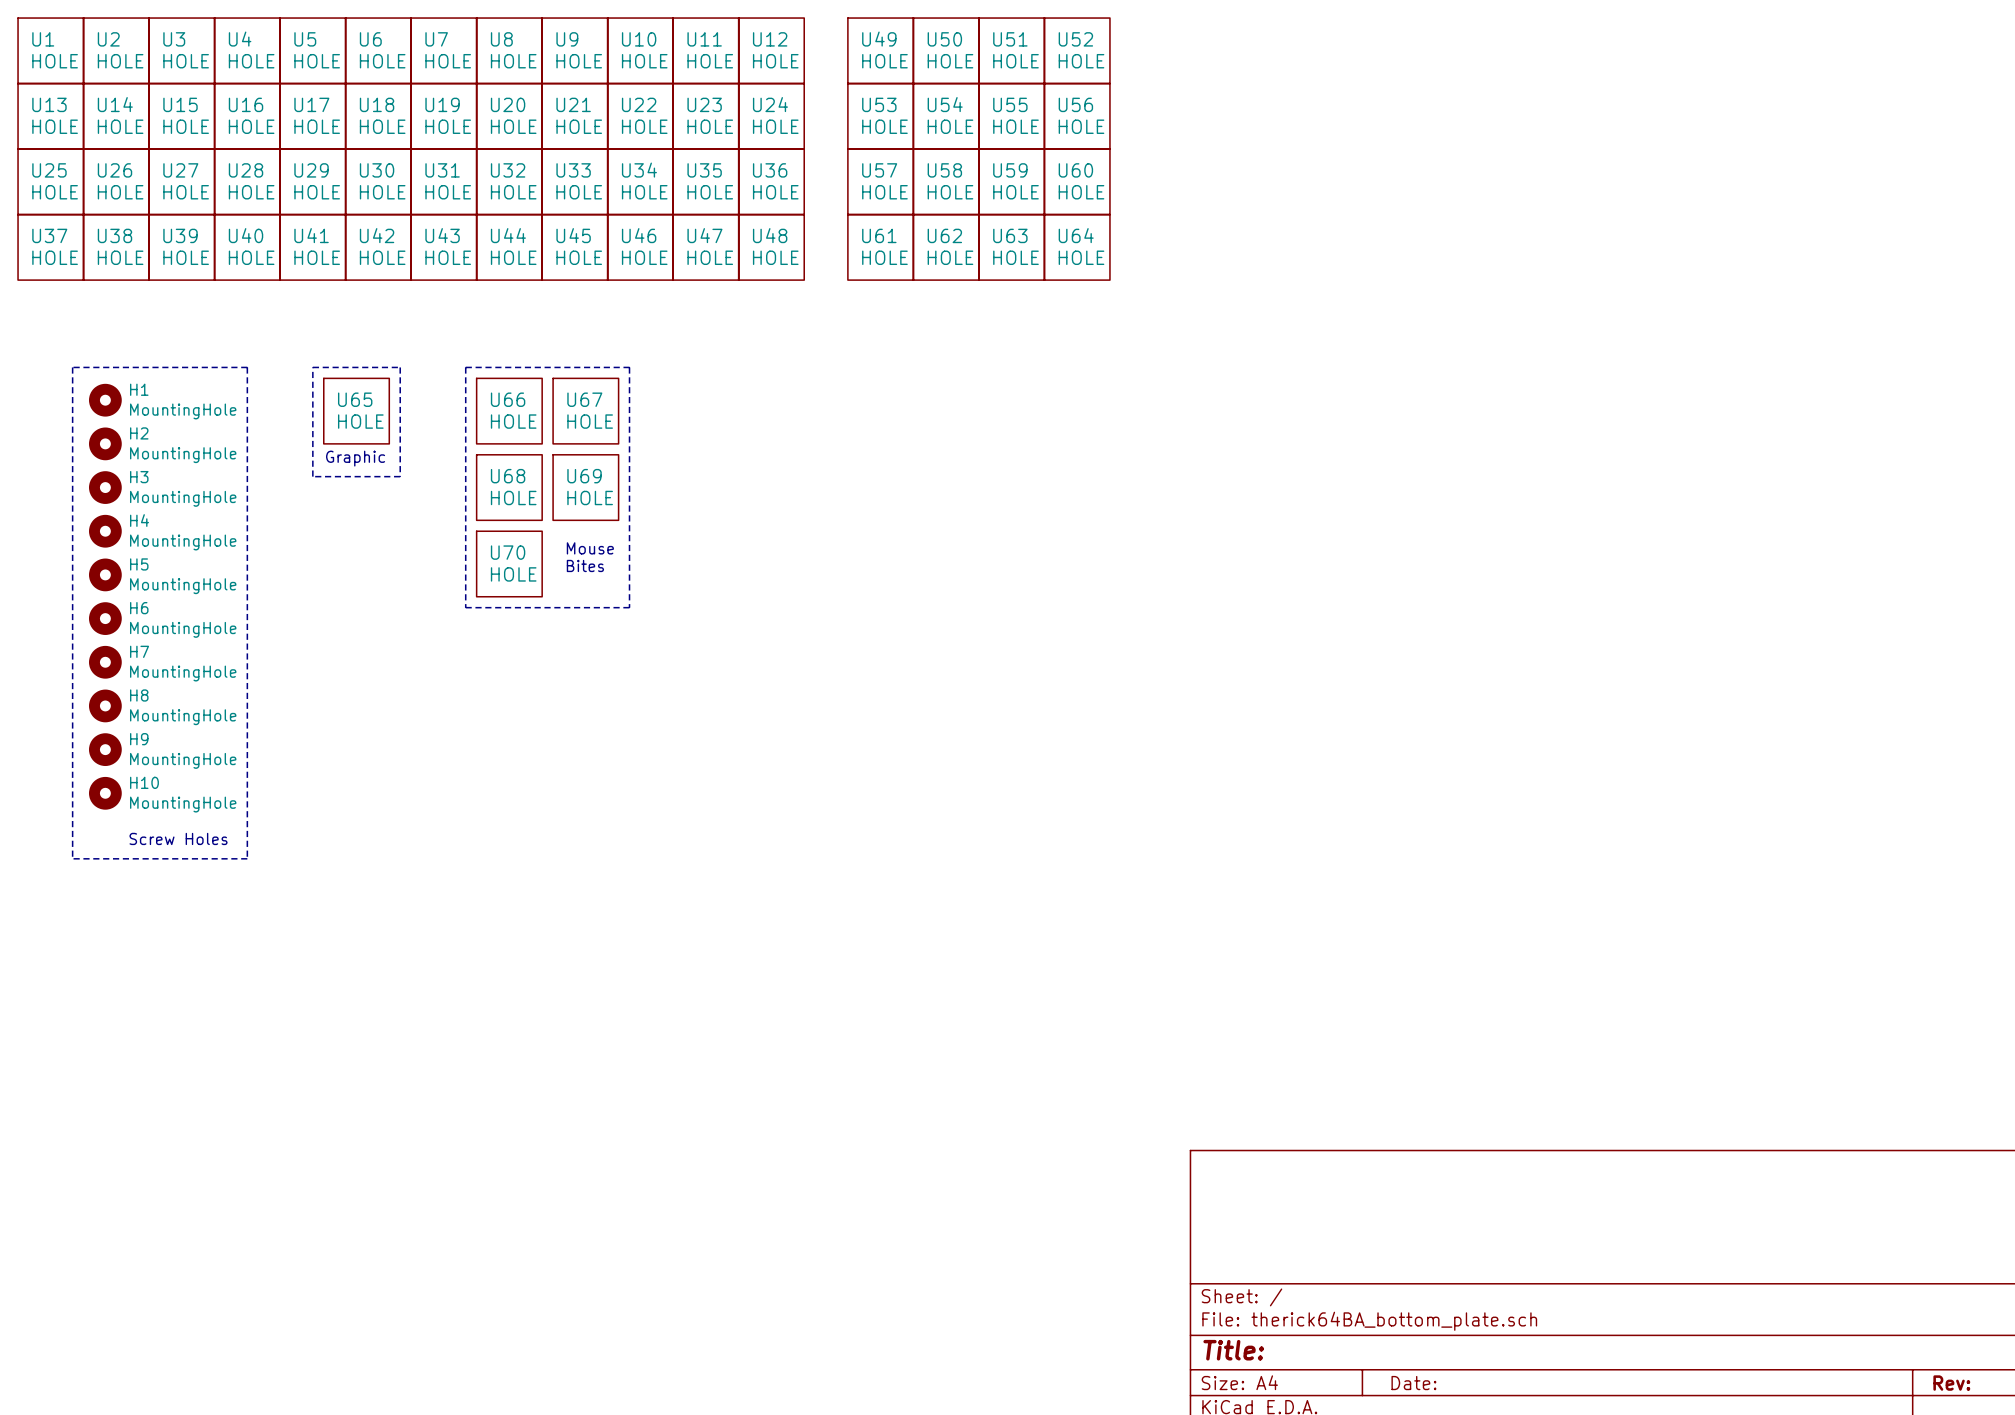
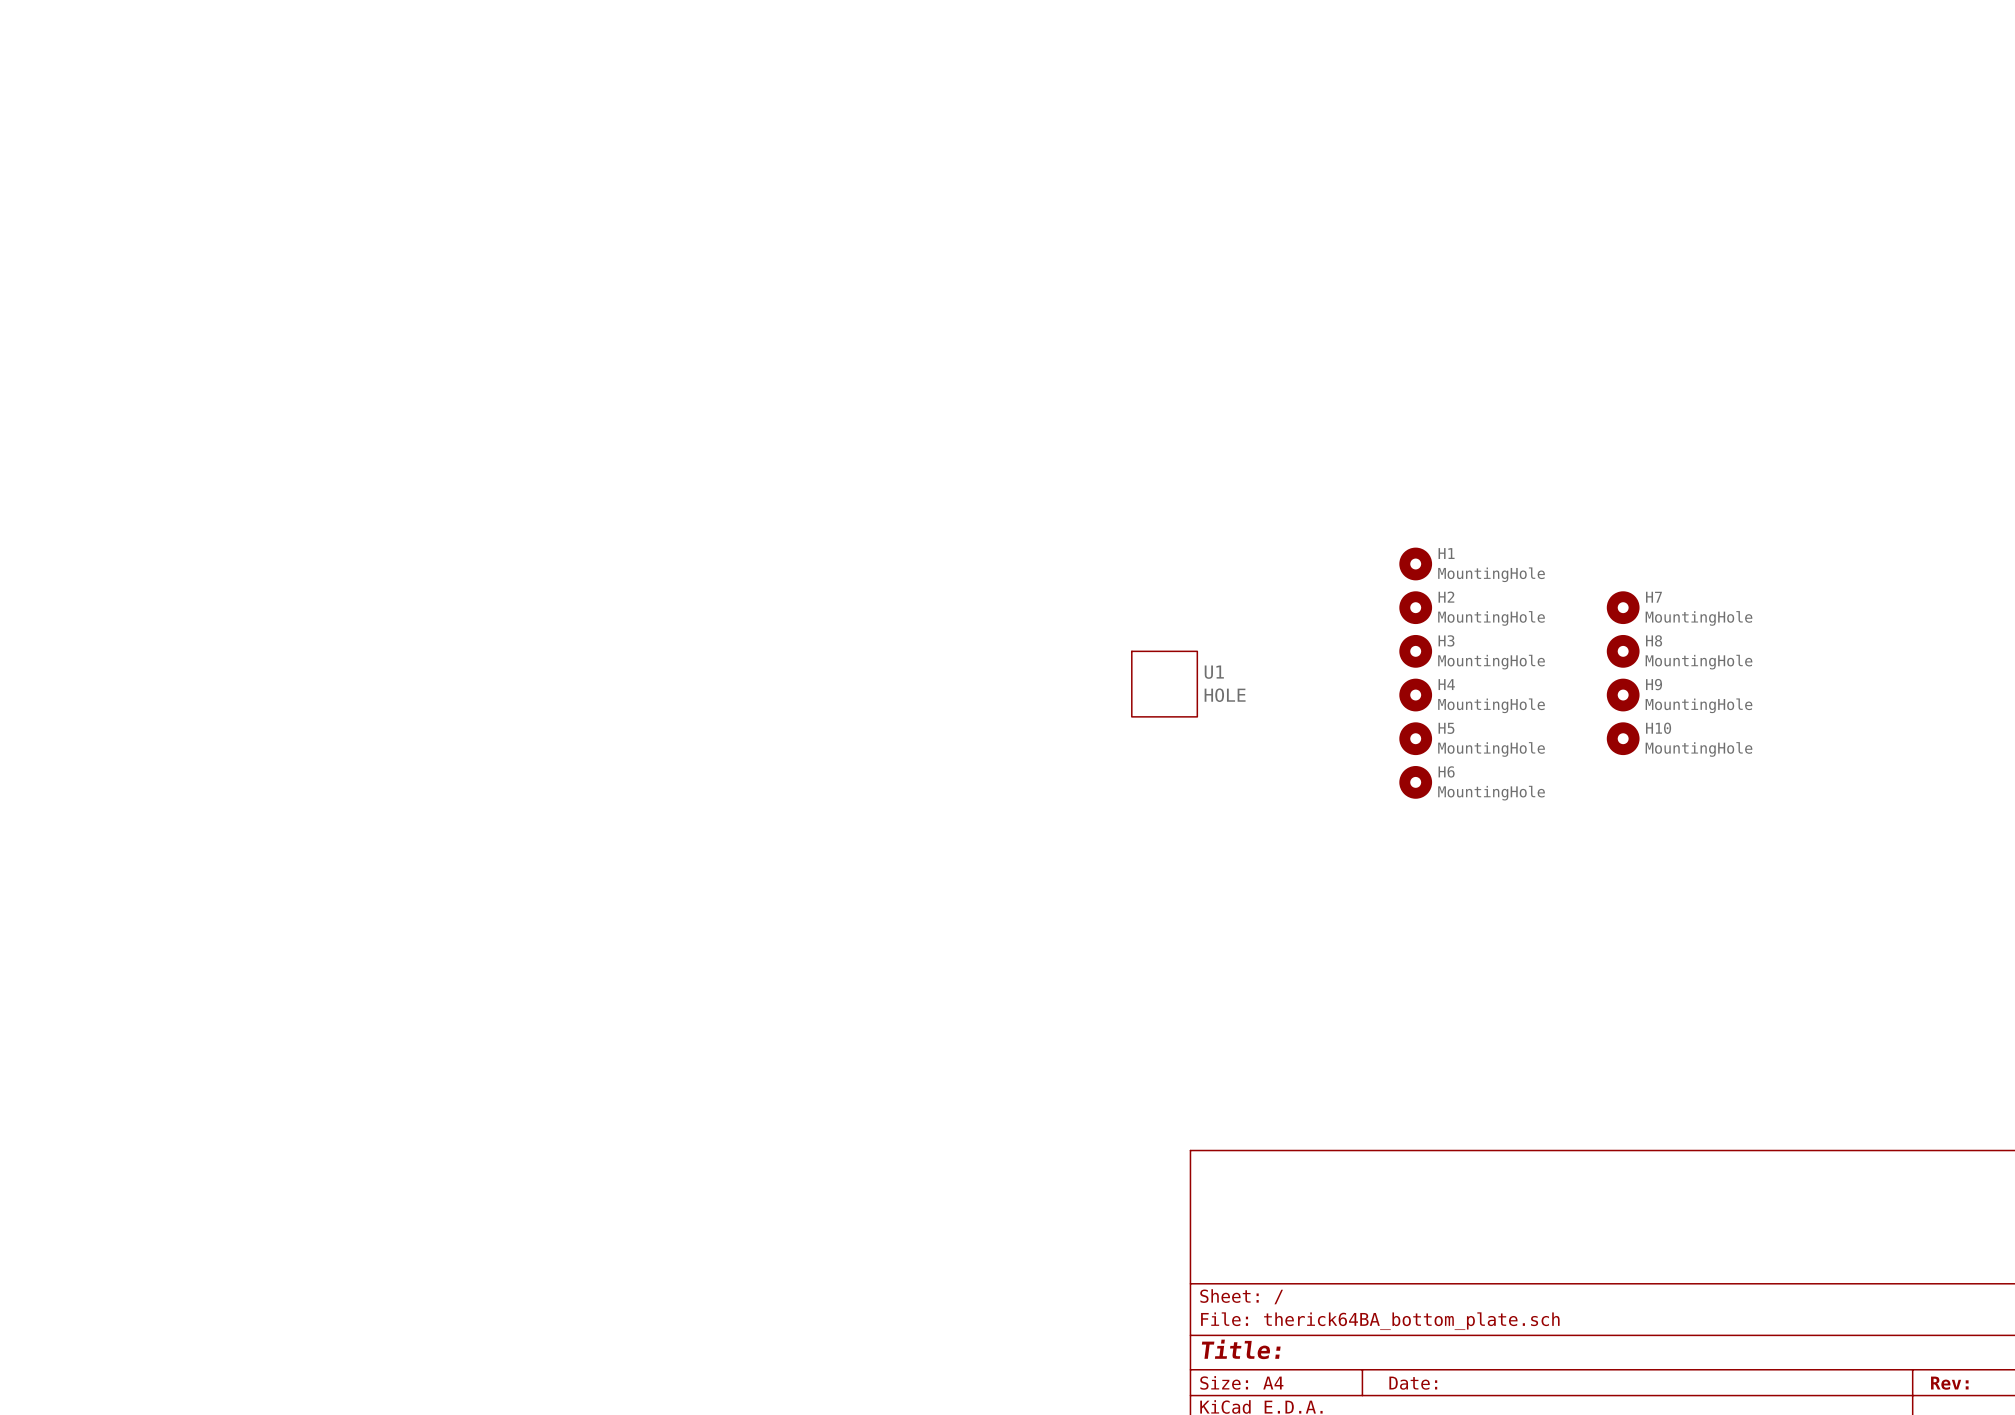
U1 name position: U1 (43, 39) -> U1 (1214, 672)
U1 position: (50, 50) -> (1164, 684)
U2: HOLE (116, 50) -> none
U3: HOLE (181, 50) -> none
U4: HOLE (247, 50) -> none
U5: HOLE (312, 50) -> none
U6: HOLE (378, 50) -> none
U7: HOLE (443, 50) -> none
U8: HOLE (509, 50) -> none
U9: HOLE (574, 50) -> none
U10: HOLE (640, 50) -> none
U11: HOLE (705, 50) -> none
U12: HOLE (771, 50) -> none
U49: HOLE (880, 50) -> none
U50: HOLE (946, 50) -> none
U51: HOLE (1011, 50) -> none
U52: HOLE (1077, 50) -> none
U1 value position: HOLE (55, 61) -> HOLE (1225, 695)
U13: HOLE (50, 116) -> none
U14: HOLE (116, 116) -> none
U15: HOLE (181, 116) -> none
U16: HOLE (247, 116) -> none
U17: HOLE (312, 116) -> none
U18: HOLE (378, 116) -> none
U19: HOLE (443, 116) -> none
U20: HOLE (509, 116) -> none
U21: HOLE (574, 116) -> none
U22: HOLE (640, 116) -> none
U23: HOLE (705, 116) -> none
U24: HOLE (771, 116) -> none
U53: HOLE (880, 116) -> none
U54: HOLE (946, 116) -> none
U55: HOLE (1011, 116) -> none
U56: HOLE (1077, 116) -> none
U25: HOLE (50, 181) -> none
U26: HOLE (116, 181) -> none
U27: HOLE (181, 181) -> none
U28: HOLE (247, 181) -> none
U29: HOLE (312, 181) -> none
U30: HOLE (378, 181) -> none
U31: HOLE (443, 181) -> none
U32: HOLE (509, 181) -> none
U33: HOLE (574, 181) -> none
U34: HOLE (640, 181) -> none
U35: HOLE (705, 181) -> none
U36: HOLE (771, 181) -> none
U57: HOLE (880, 181) -> none
U58: HOLE (946, 181) -> none
U59: HOLE (1011, 181) -> none
U60: HOLE (1077, 181) -> none
U37: HOLE (50, 247) -> none
U38: HOLE (116, 247) -> none
U39: HOLE (181, 247) -> none
U40: HOLE (247, 247) -> none
U41: HOLE (312, 247) -> none
U42: HOLE (378, 247) -> none
U43: HOLE (443, 247) -> none
U44: HOLE (509, 247) -> none
U45: HOLE (574, 247) -> none
U46: HOLE (640, 247) -> none
U47: HOLE (705, 247) -> none
U48: HOLE (771, 247) -> none
U61: HOLE (880, 247) -> none
U62: HOLE (946, 247) -> none
U63: HOLE (1011, 247) -> none
U64: HOLE (1077, 247) -> none
line: (72, 367) (247, 367) (247, 858) (72, 858) (72, 367) -> none
line: (312, 367) (400, 367) (400, 476) (312, 476) (312, 367) -> none
line: (465, 367) (629, 367) (629, 607) (465, 607) (465, 367) -> none
H1 position: (105, 400) -> (1415, 563)
U65: HOLE (356, 411) -> none
U66: HOLE (509, 411) -> none
U67: HOLE (585, 411) -> none
H2 position: (105, 443) -> (1415, 607)
text: Graphic (355, 458) -> none
H3 position: (105, 487) -> (1415, 651)
U68: HOLE (509, 487) -> none
U69: HOLE (585, 487) -> none
H4 position: (105, 531) -> (1415, 695)
text: Mouse (590, 548) -> none
U70: HOLE (509, 563) -> none
text: Bites (585, 565) -> none
H5 position: (105, 574) -> (1415, 738)
H6 position: (105, 618) -> (1415, 782)
H7 position: (105, 662) -> (1623, 607)
H8 position: (105, 705) -> (1623, 651)
H9 position: (105, 749) -> (1623, 695)
H10 position: (105, 793) -> (1623, 738)
text: Screw Holes (178, 838) -> none

